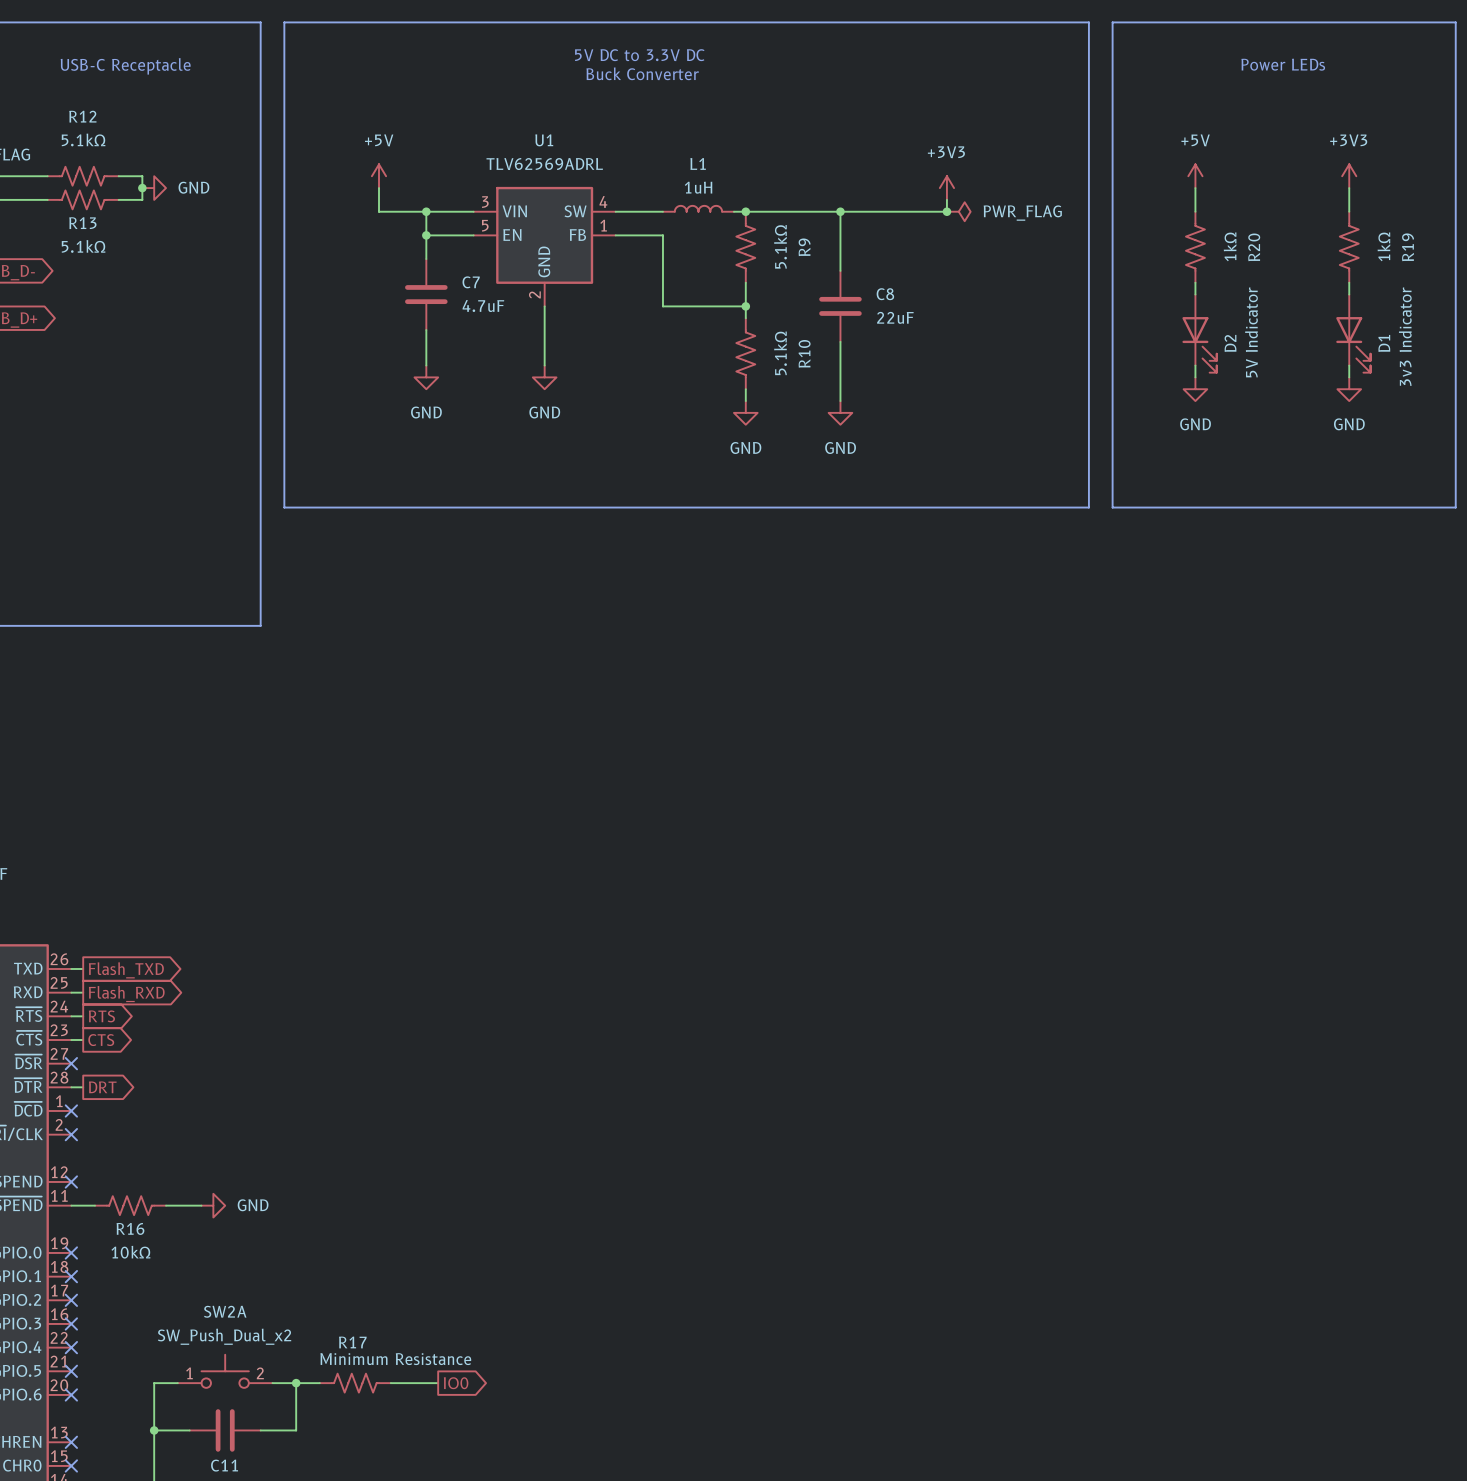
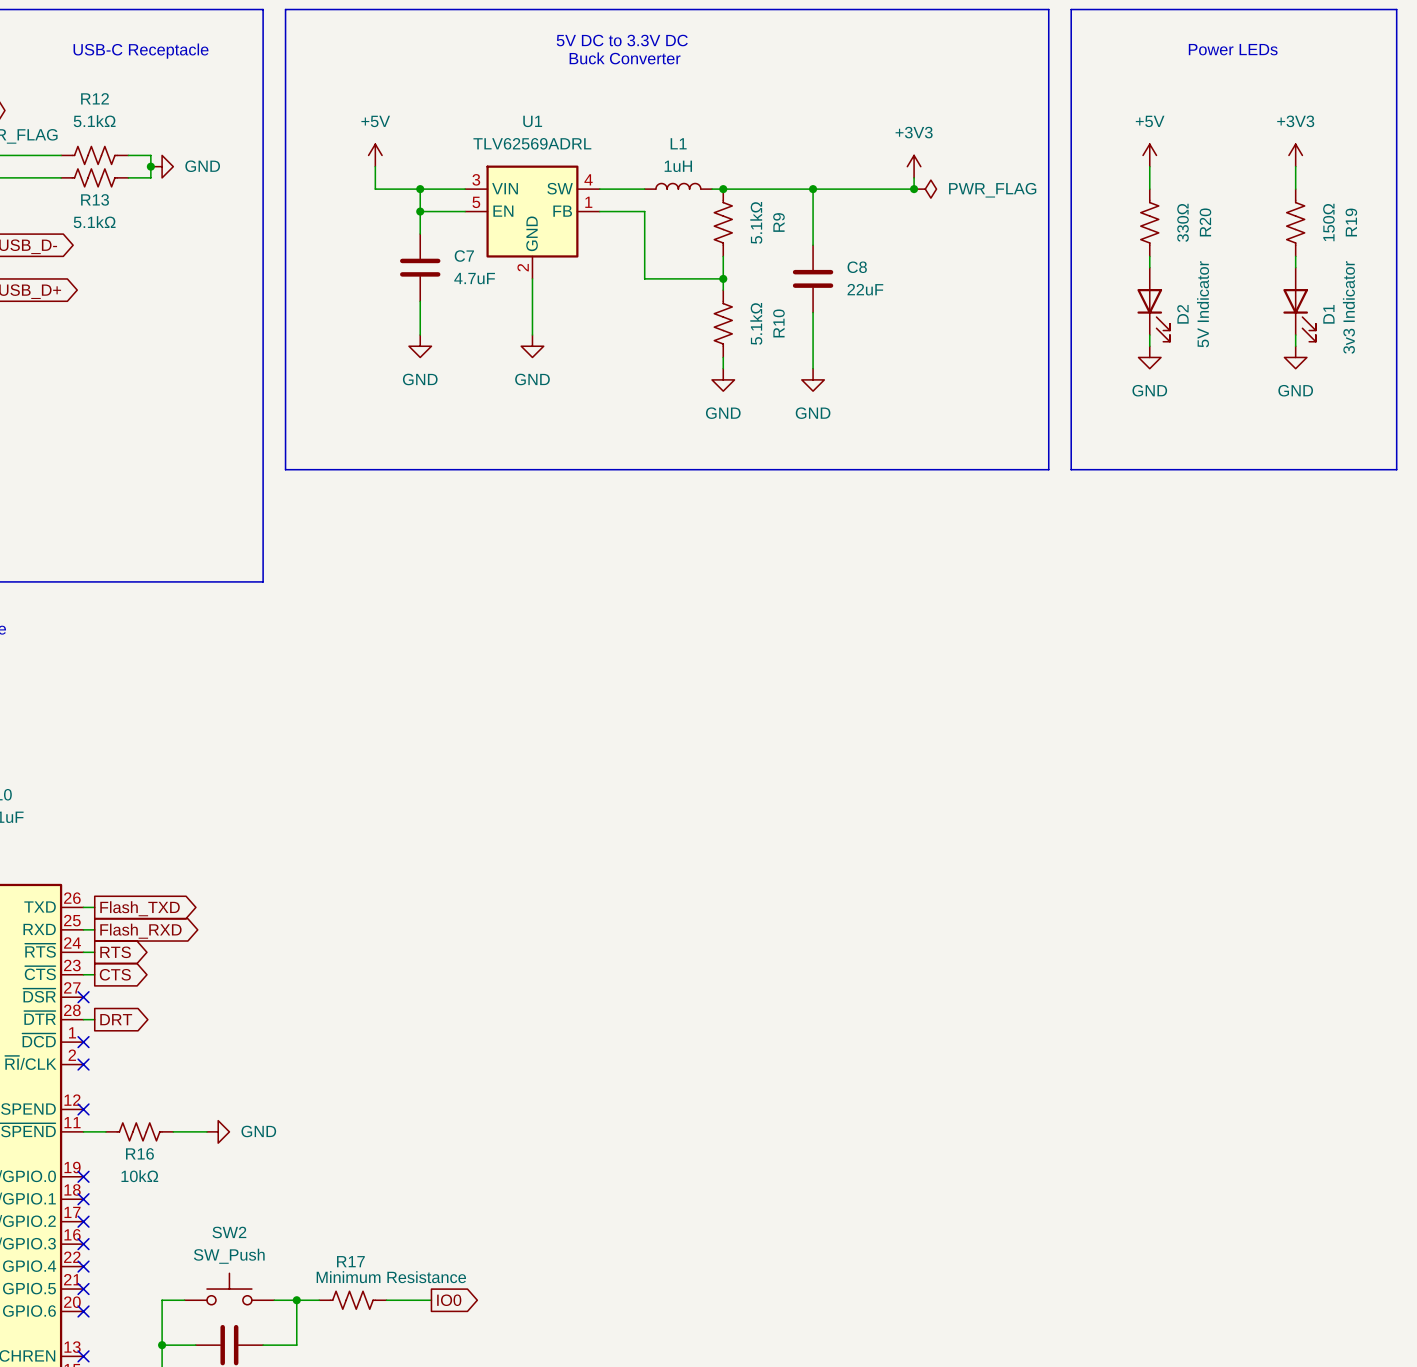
R20 value: 1kΩ (1230, 246) -> 330Ω (1183, 222)
R19 value: 1kΩ (1383, 246) -> 150Ω (1328, 222)
SW2A name: SW2A (225, 1311) -> SW2 (229, 1232)
SW2A value: SW_Push_Dual_x2 (224, 1336) -> SW_Push (229, 1256)
SW2A pin number: 1 (189, 1373) -> none
SW2A pin number: 2 (260, 1373) -> none

